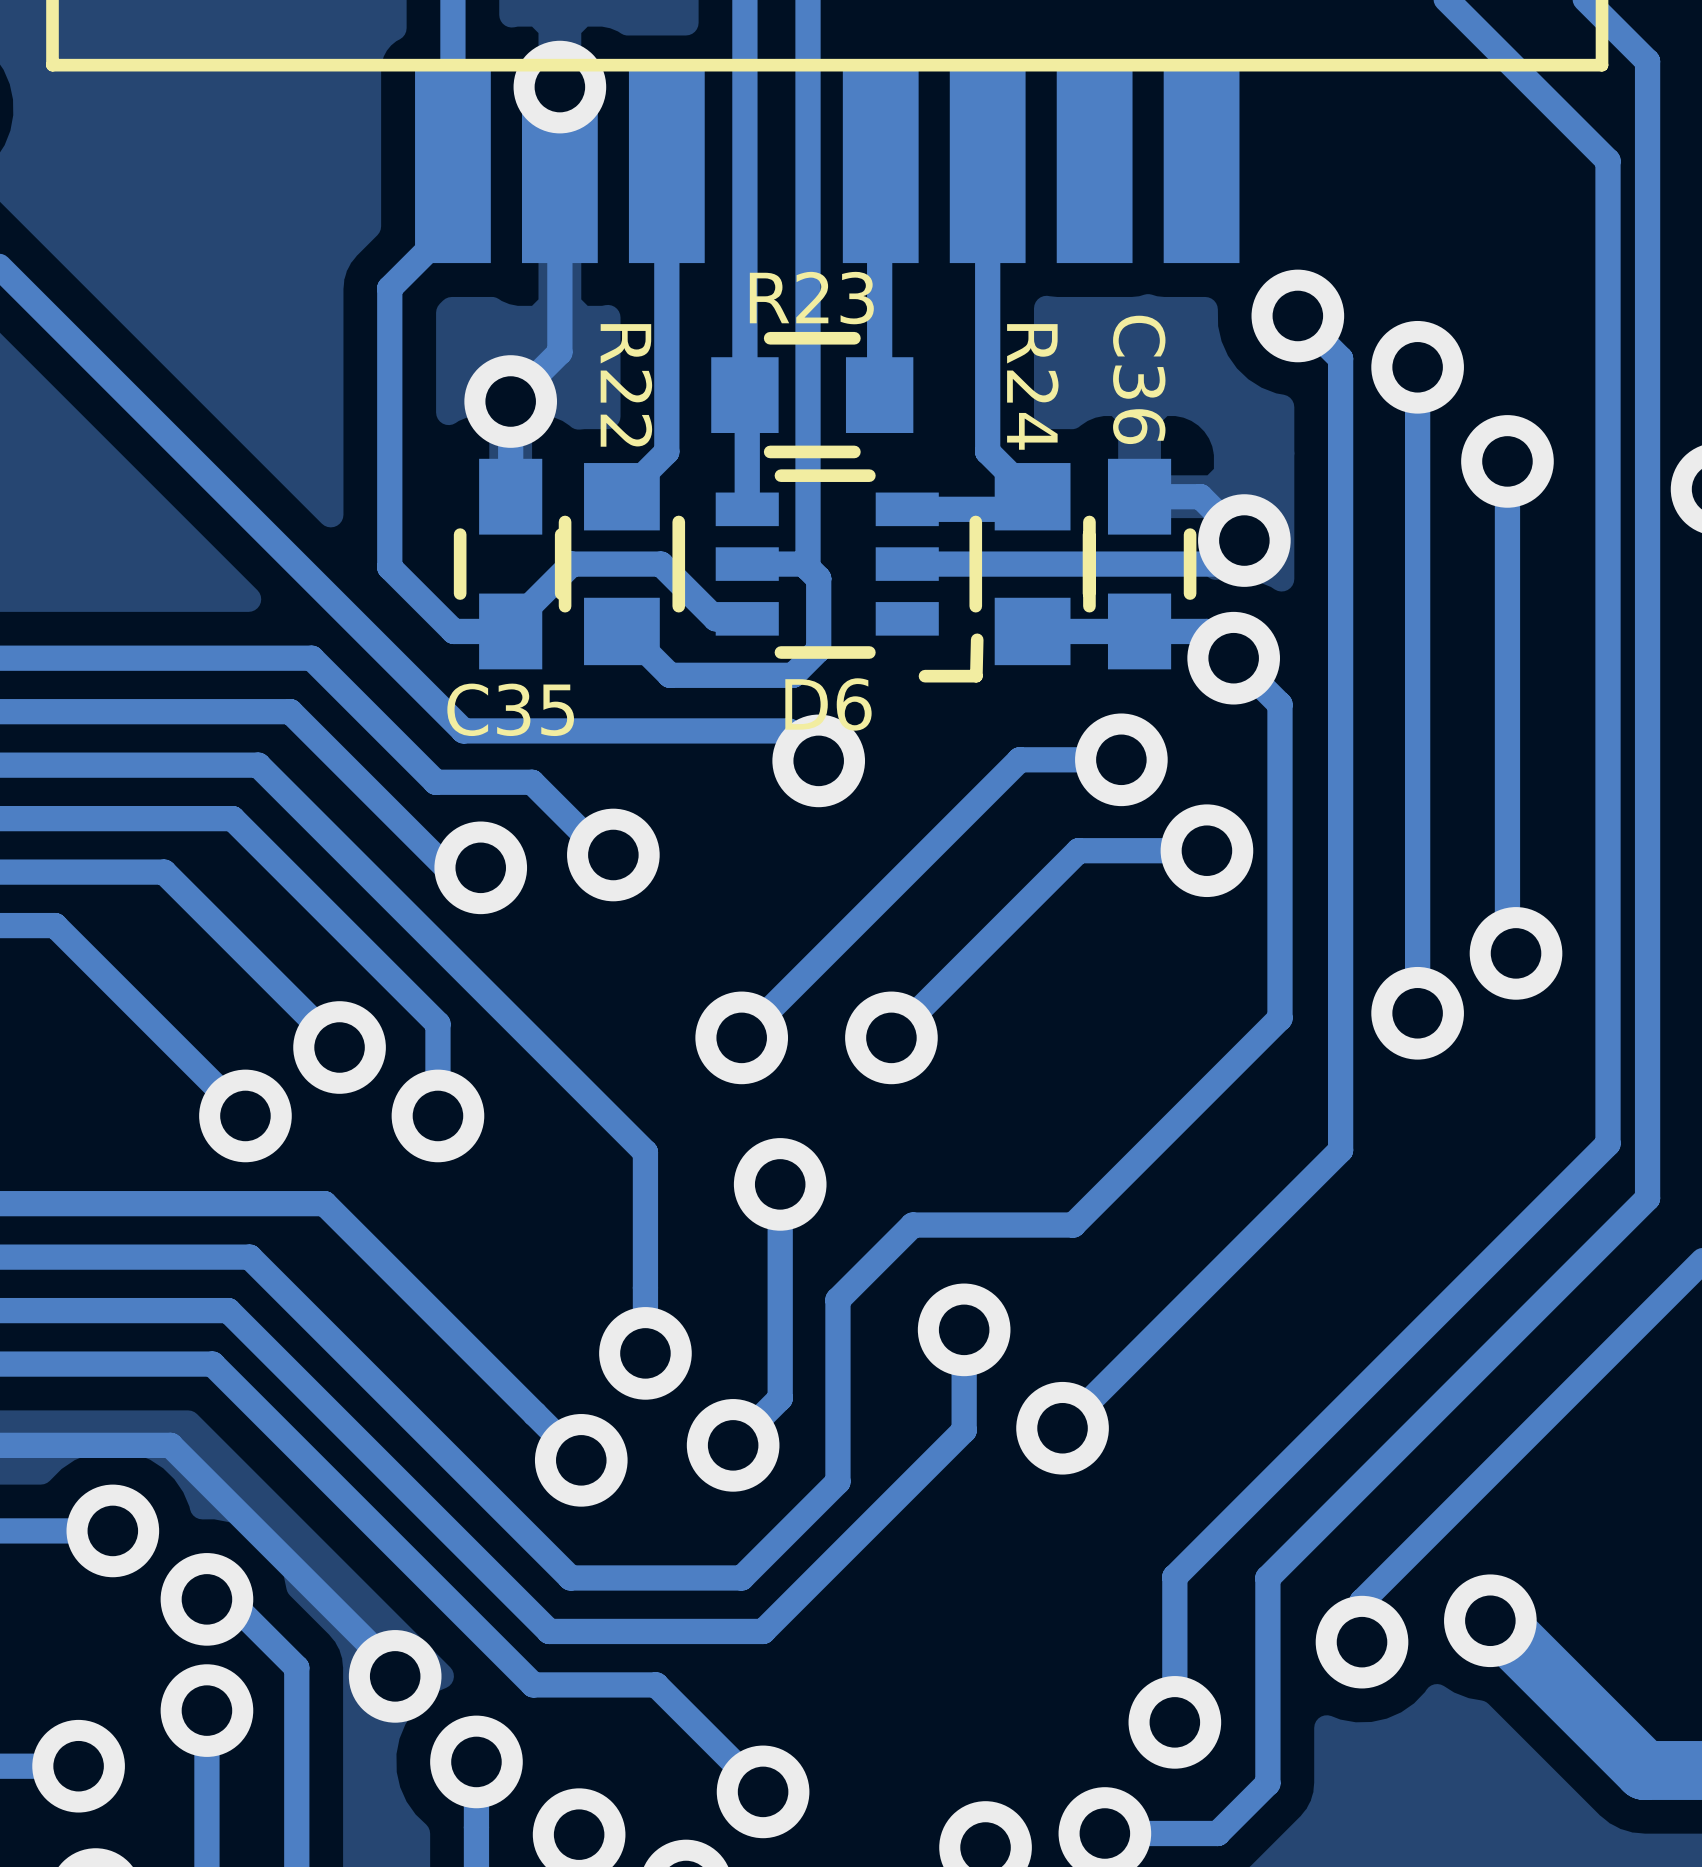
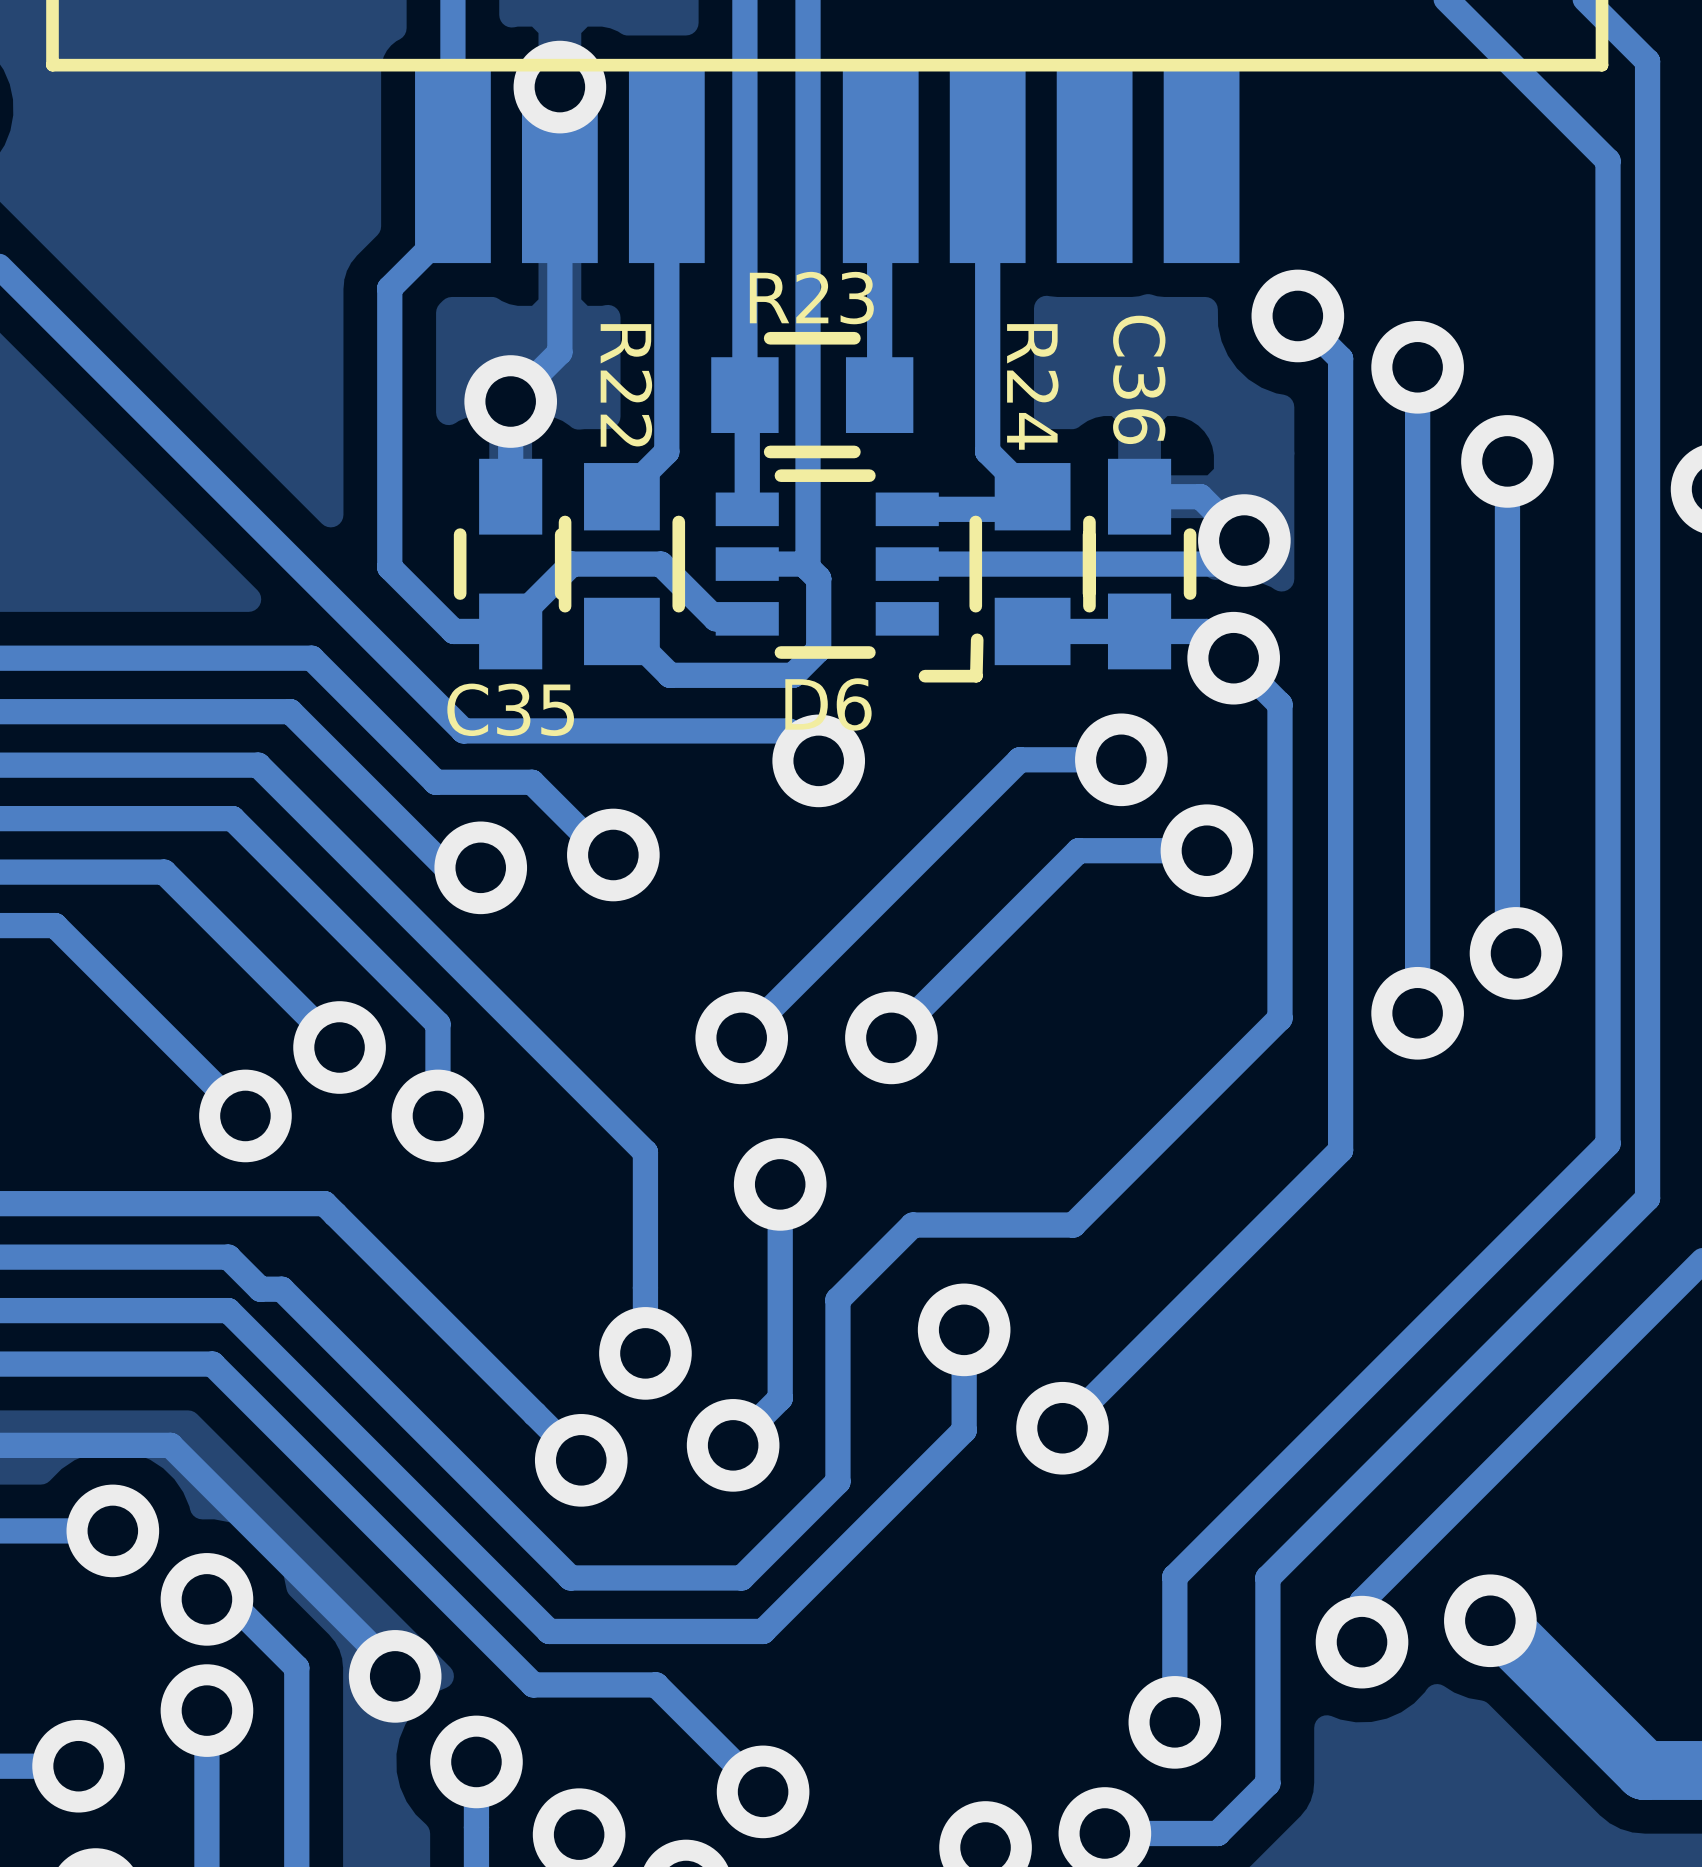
track: (228, 1257) (249, 1257) (281, 1289) -> (228, 1257) (260, 1289) (281, 1289)

